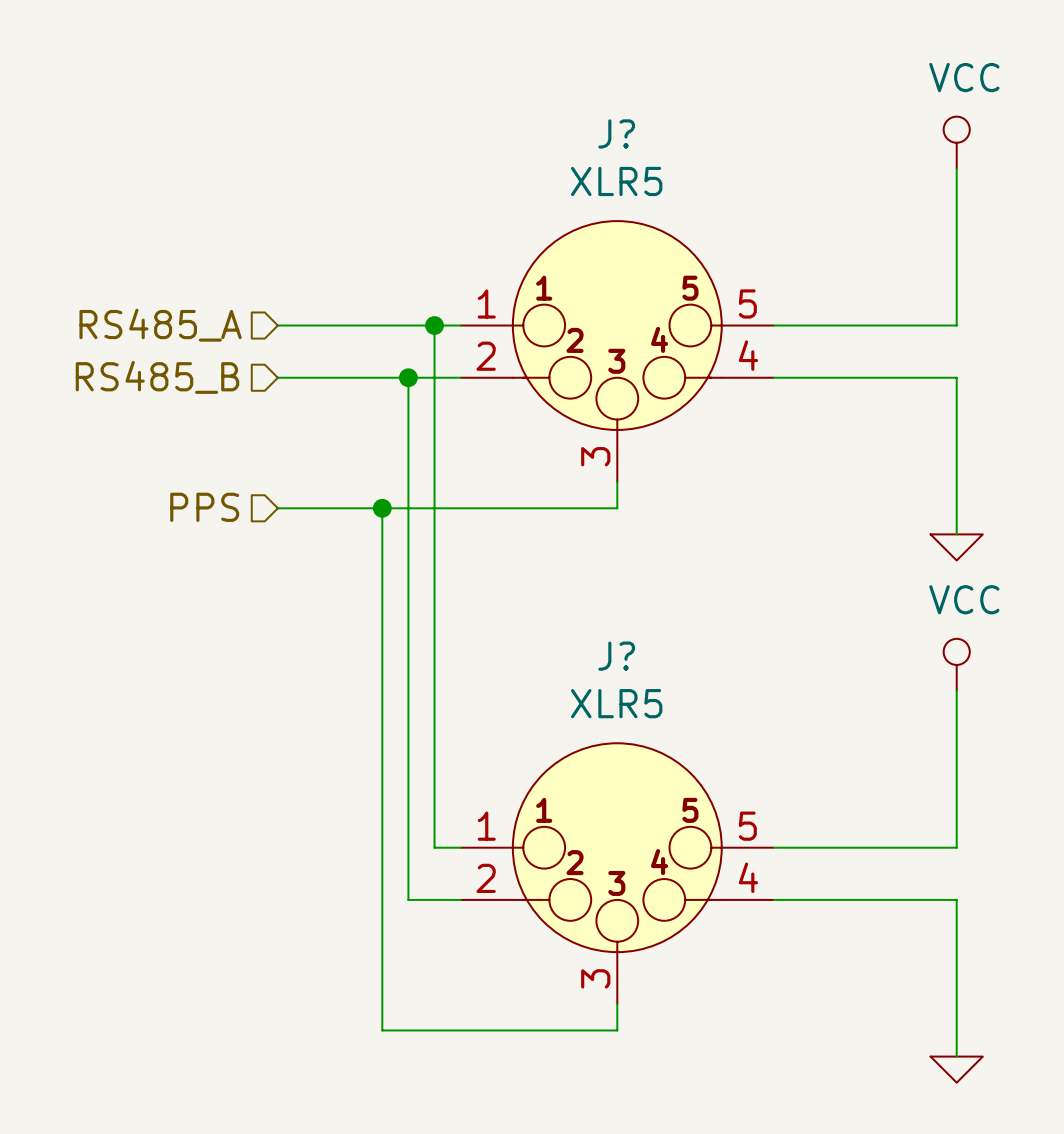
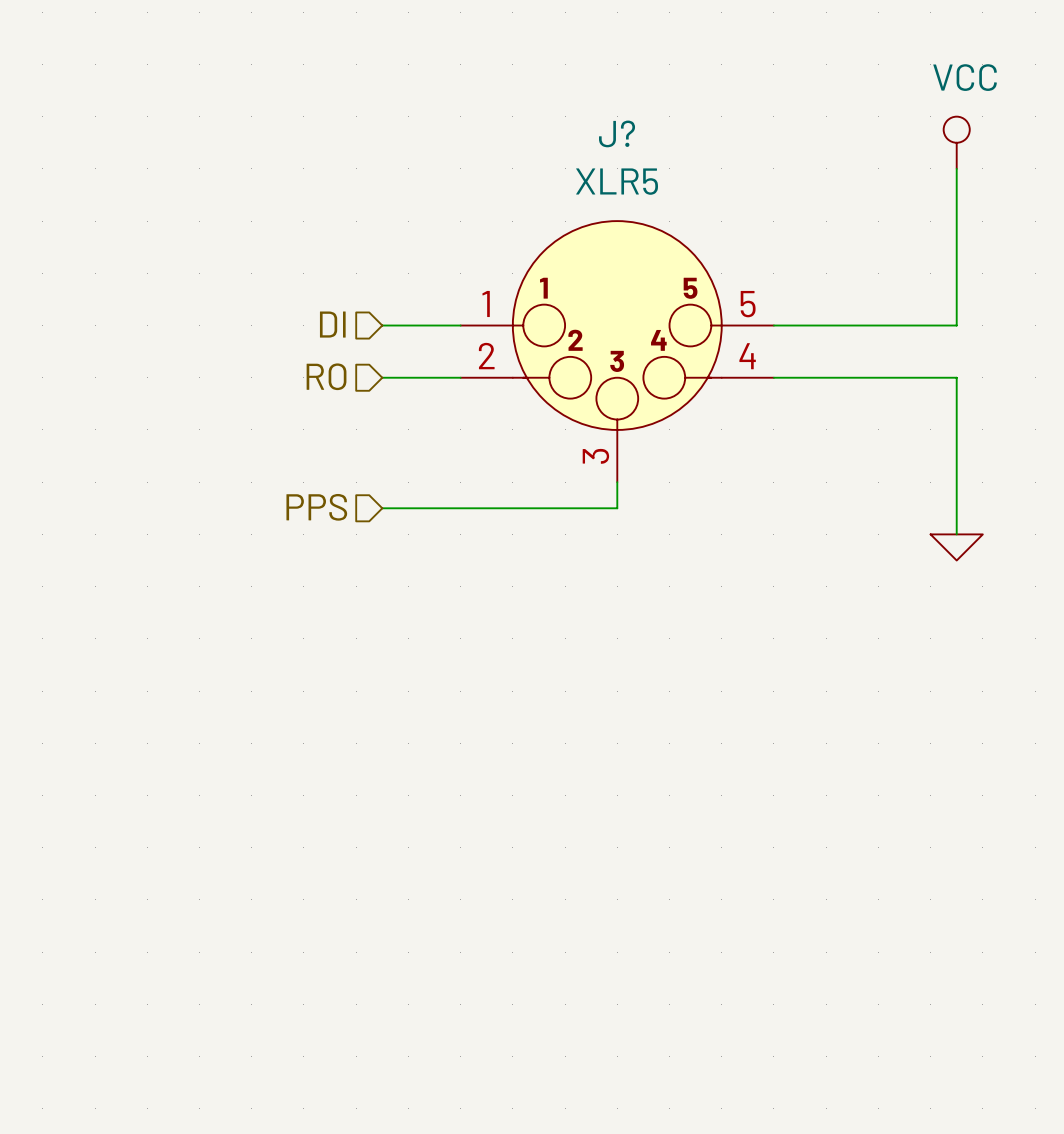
hierarchical label: none -> DI (332, 324)
hierarchical label: RS485_A (160, 325) -> none
wire: (277, 325) (382, 325) -> none
wire: (434, 325) (434, 847) (460, 847) -> none
junction: (434, 325) -> none
hierarchical label: none -> RO (326, 376)
hierarchical label: RS485_B (157, 377) -> none
wire: (277, 377) (382, 377) -> none
wire: (408, 377) (408, 899) (460, 899) -> none
junction: (408, 377) -> none
hierarchical label position: PPS (204, 507) -> PPS (316, 507)
wire: (277, 508) (382, 508) (382, 1030) (617, 1030) (617, 1004) -> none
junction: (382, 508) -> none
power symbol: VCC (956, 664) -> none
wire: (956, 691) (956, 847) (773, 847) -> none
J?: XLR5 (617, 873) -> none
wire: (773, 899) (956, 899) (956, 1056) -> none
power symbol: (956, 1069) -> none

